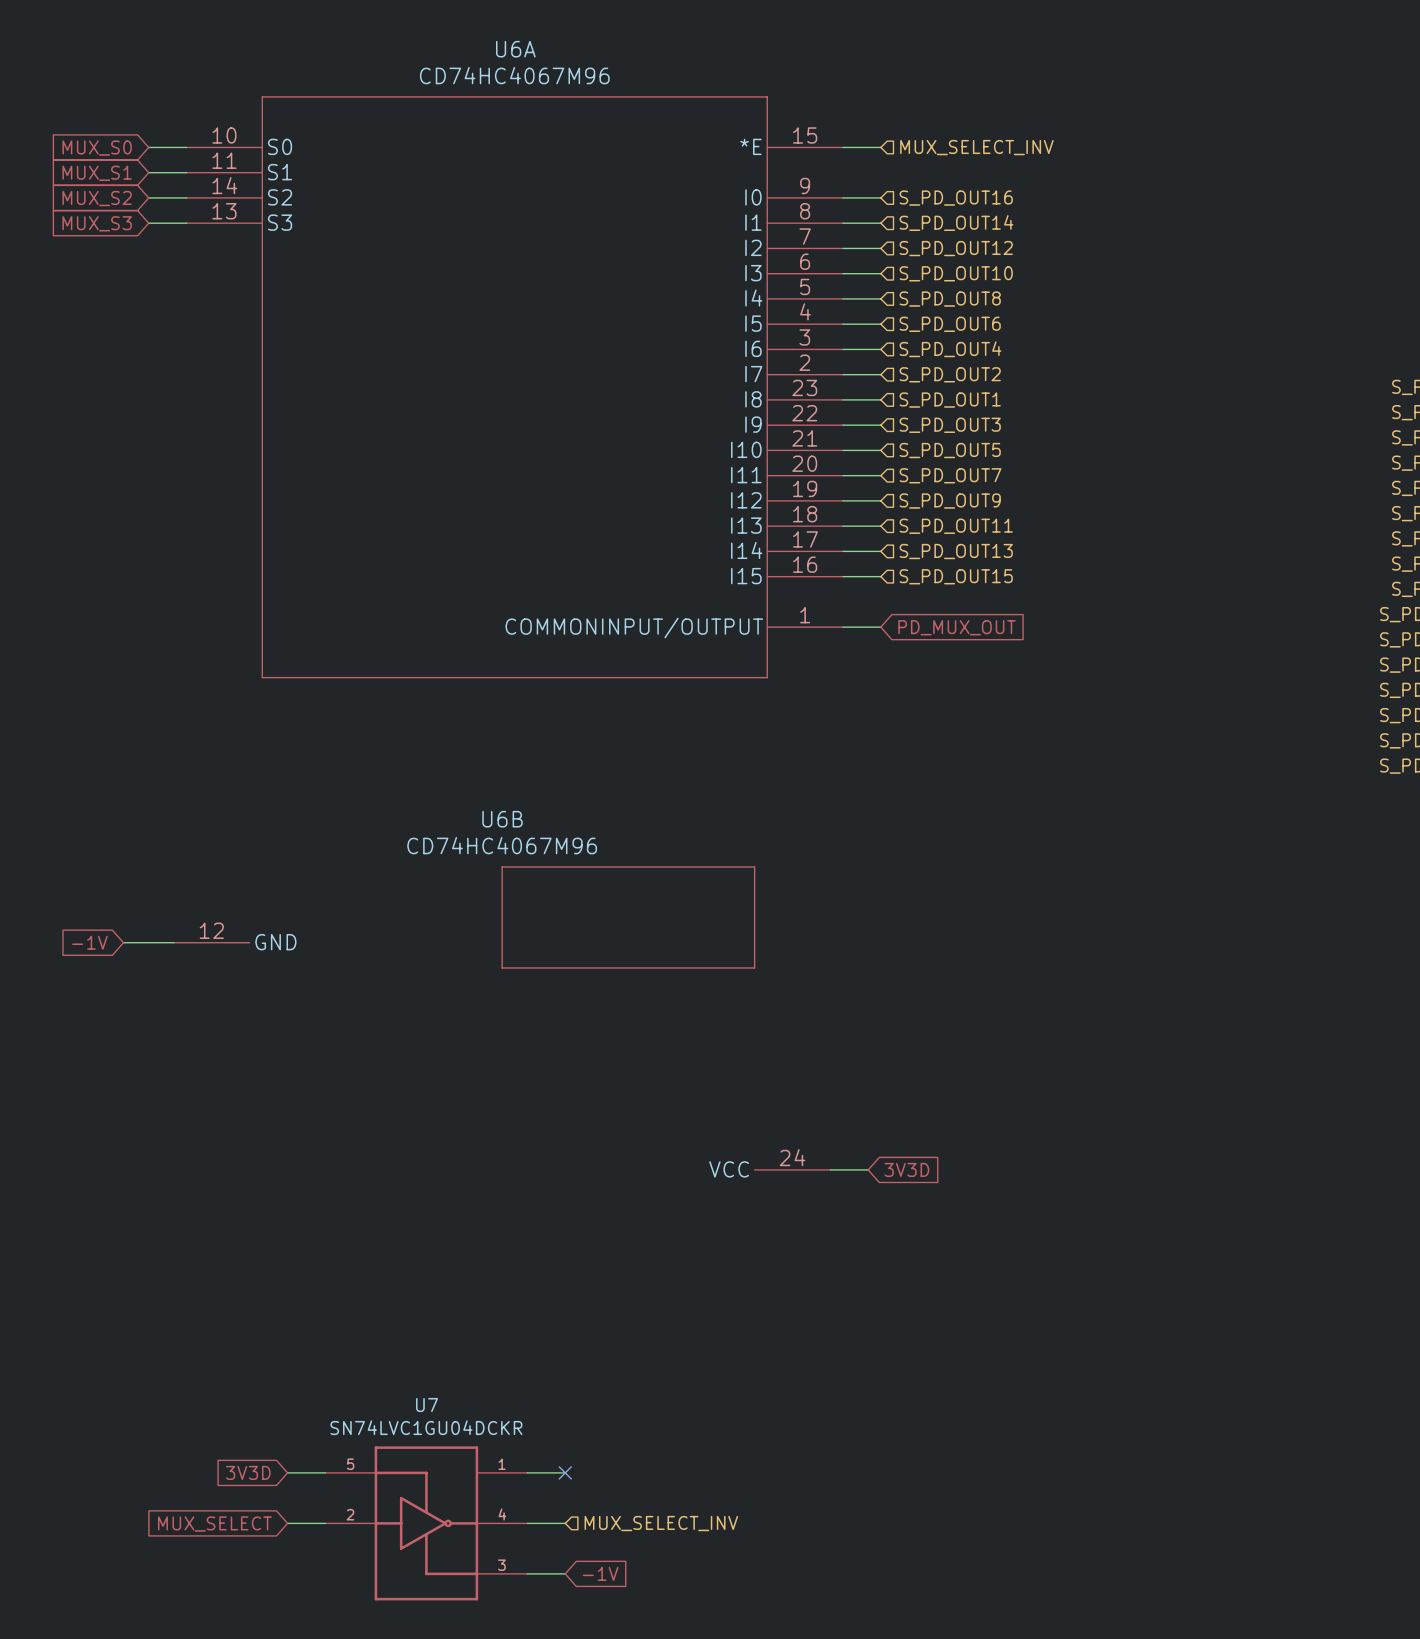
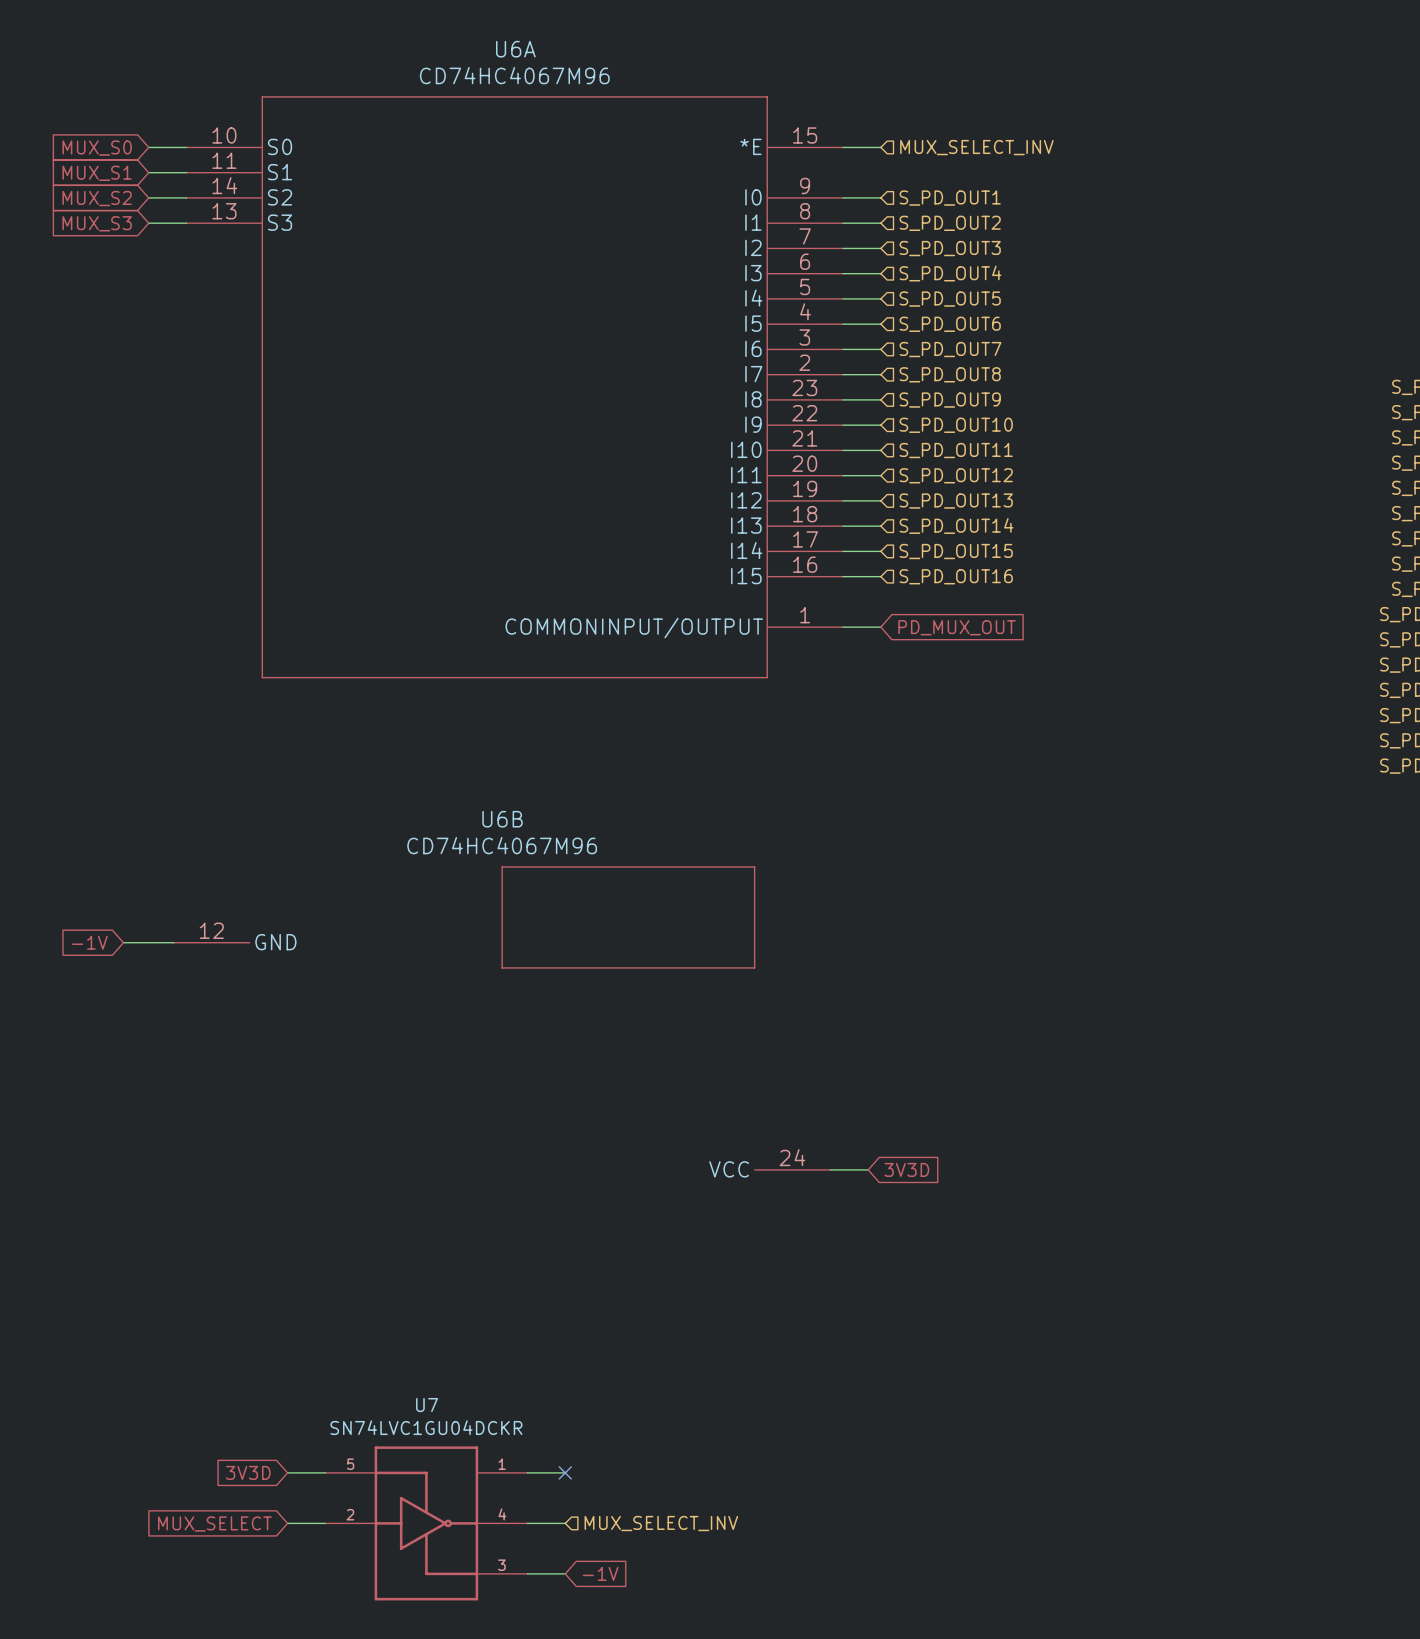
hierarchical label: S_PD_OUT16 (956, 198) -> S_PD_OUT1 (950, 198)
hierarchical label: S_PD_OUT14 (956, 223) -> S_PD_OUT2 (950, 223)
hierarchical label: S_PD_OUT12 (956, 248) -> S_PD_OUT3 (950, 248)
hierarchical label: S_PD_OUT10 (956, 273) -> S_PD_OUT4 (950, 273)
hierarchical label: S_PD_OUT8 (950, 299) -> S_PD_OUT5 (950, 299)
hierarchical label: S_PD_OUT4 (950, 349) -> S_PD_OUT7 (950, 349)
hierarchical label: S_PD_OUT2 (950, 374) -> S_PD_OUT8 (950, 374)
hierarchical label: S_PD_OUT1 (950, 400) -> S_PD_OUT9 (950, 400)
hierarchical label: S_PD_OUT3 (950, 425) -> S_PD_OUT10 (956, 425)
hierarchical label: S_PD_OUT5 (950, 450) -> S_PD_OUT11 (956, 450)
hierarchical label: S_PD_OUT7 (950, 475) -> S_PD_OUT12 (956, 475)
hierarchical label: S_PD_OUT9 (950, 501) -> S_PD_OUT13 (956, 501)
hierarchical label: S_PD_OUT11 (956, 526) -> S_PD_OUT14 (956, 525)
hierarchical label: S_PD_OUT13 (956, 551) -> S_PD_OUT15 (956, 551)
hierarchical label: S_PD_OUT15 (956, 576) -> S_PD_OUT16 (956, 576)

